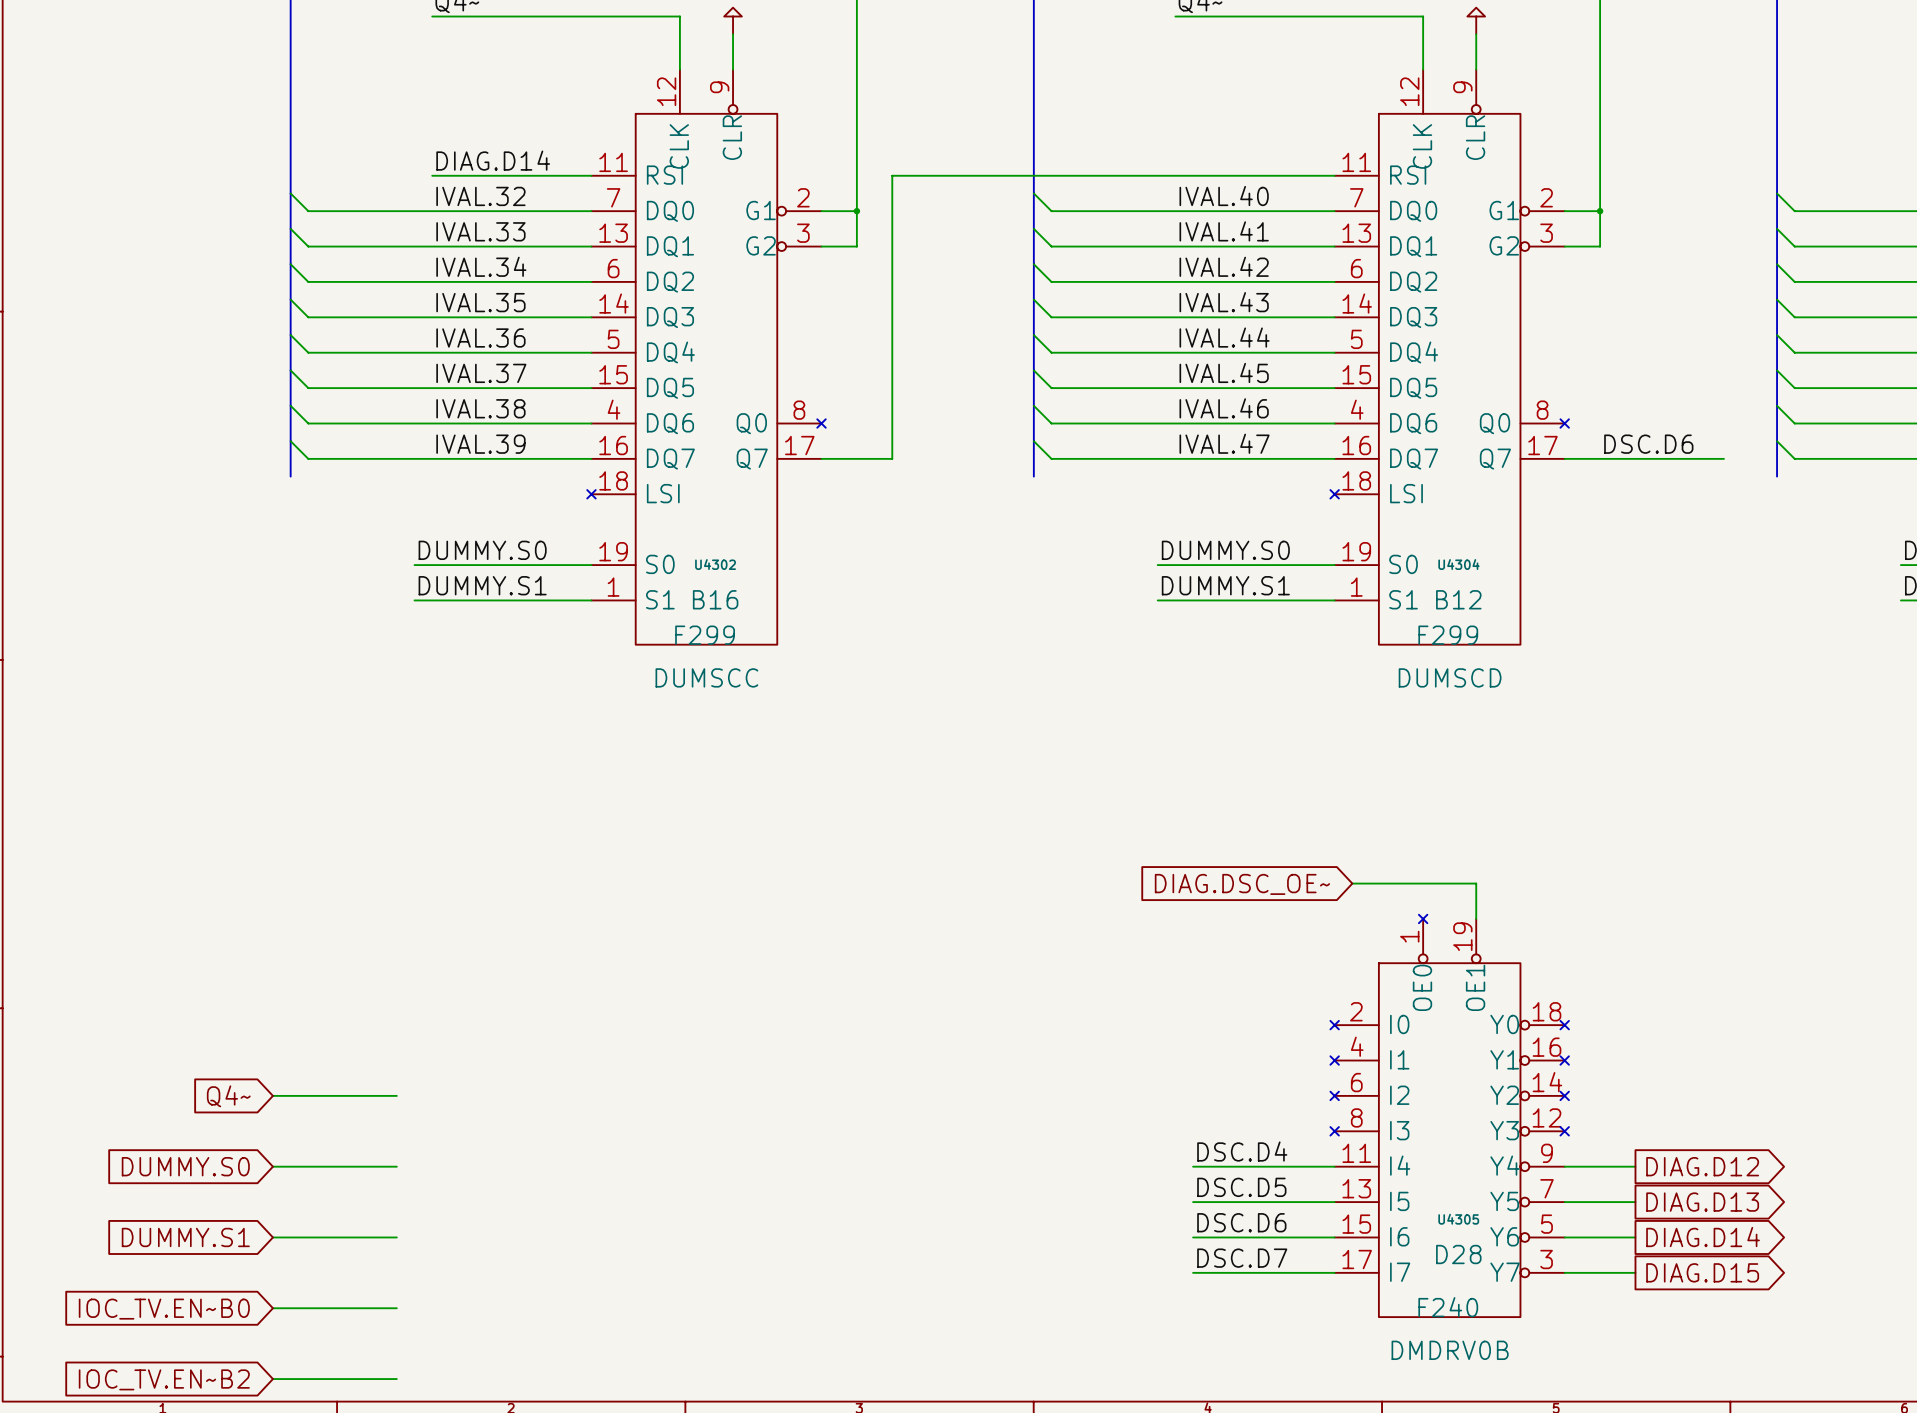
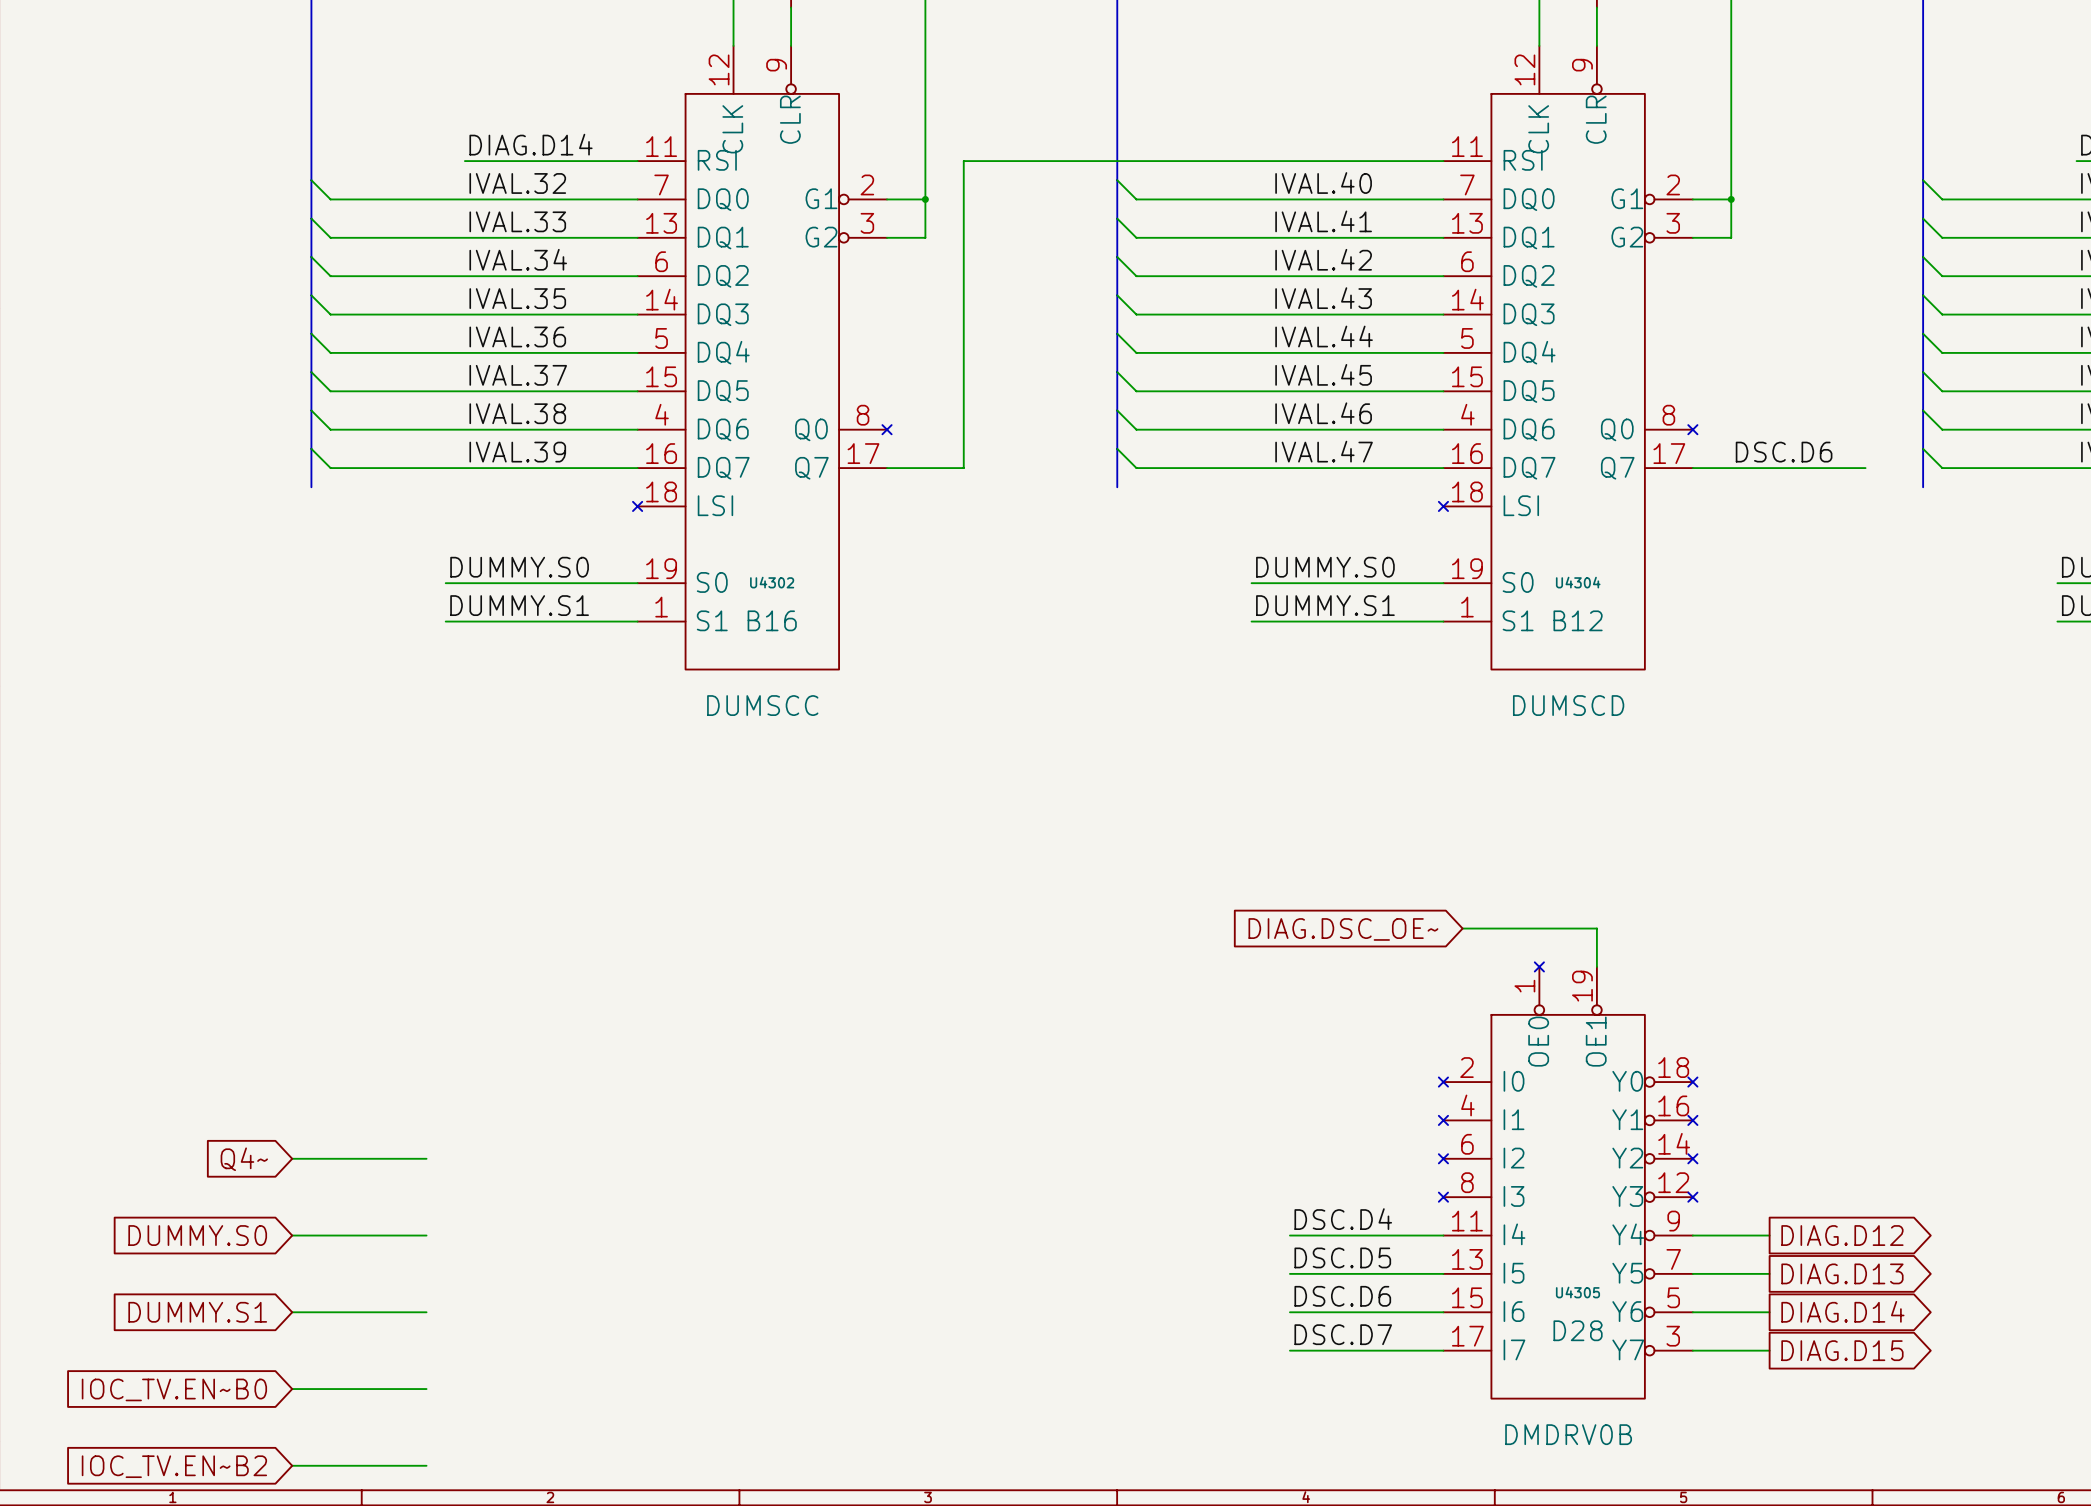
U4302 value: F299 (705, 635) -> none
U4304 value: F299 (1448, 635) -> none
U4305 value: F240 (1448, 1307) -> none

